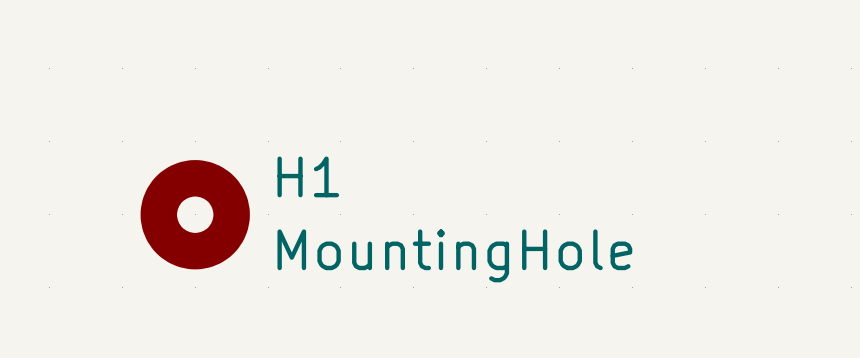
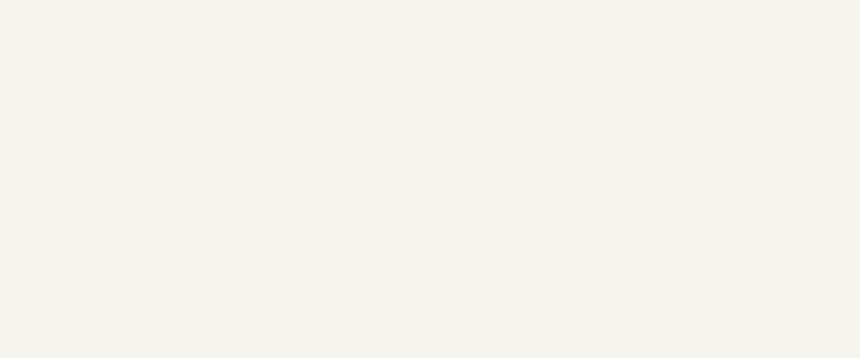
H1: MountingHole (195, 214) -> none

